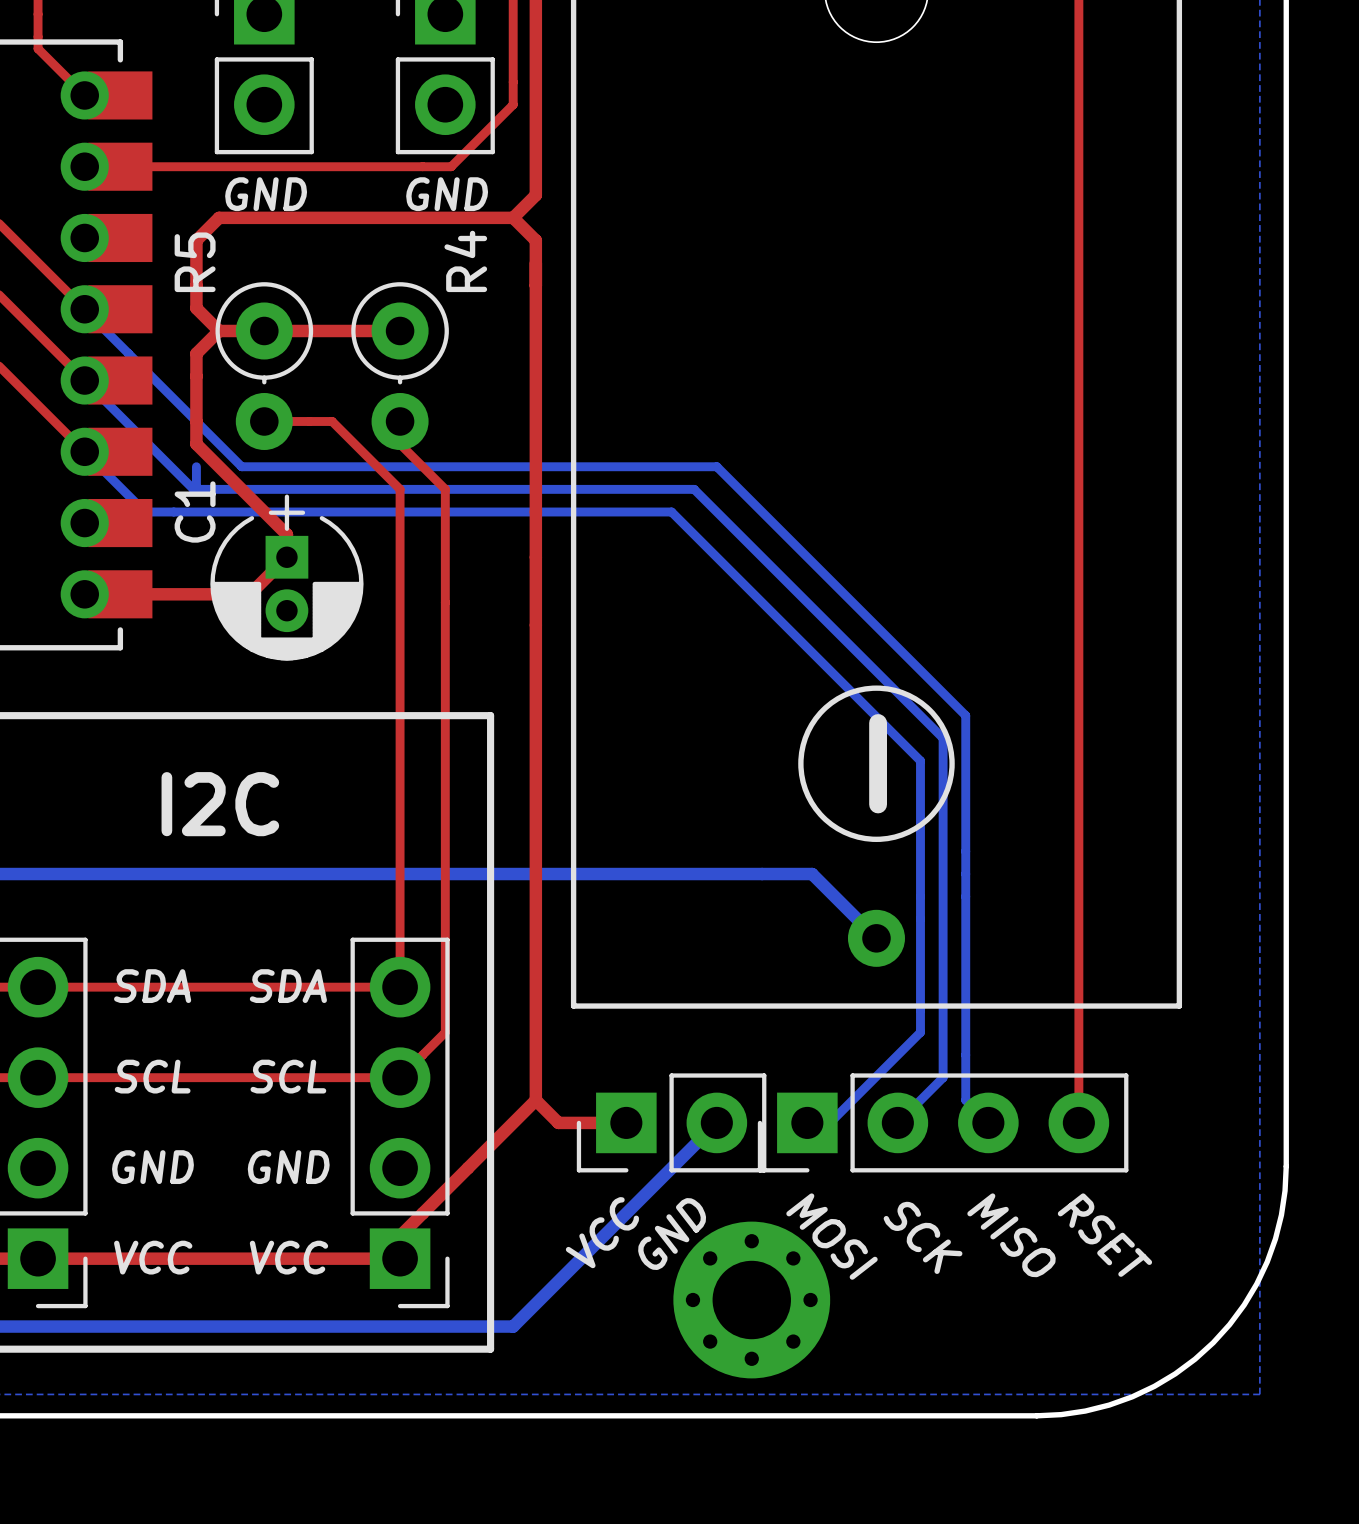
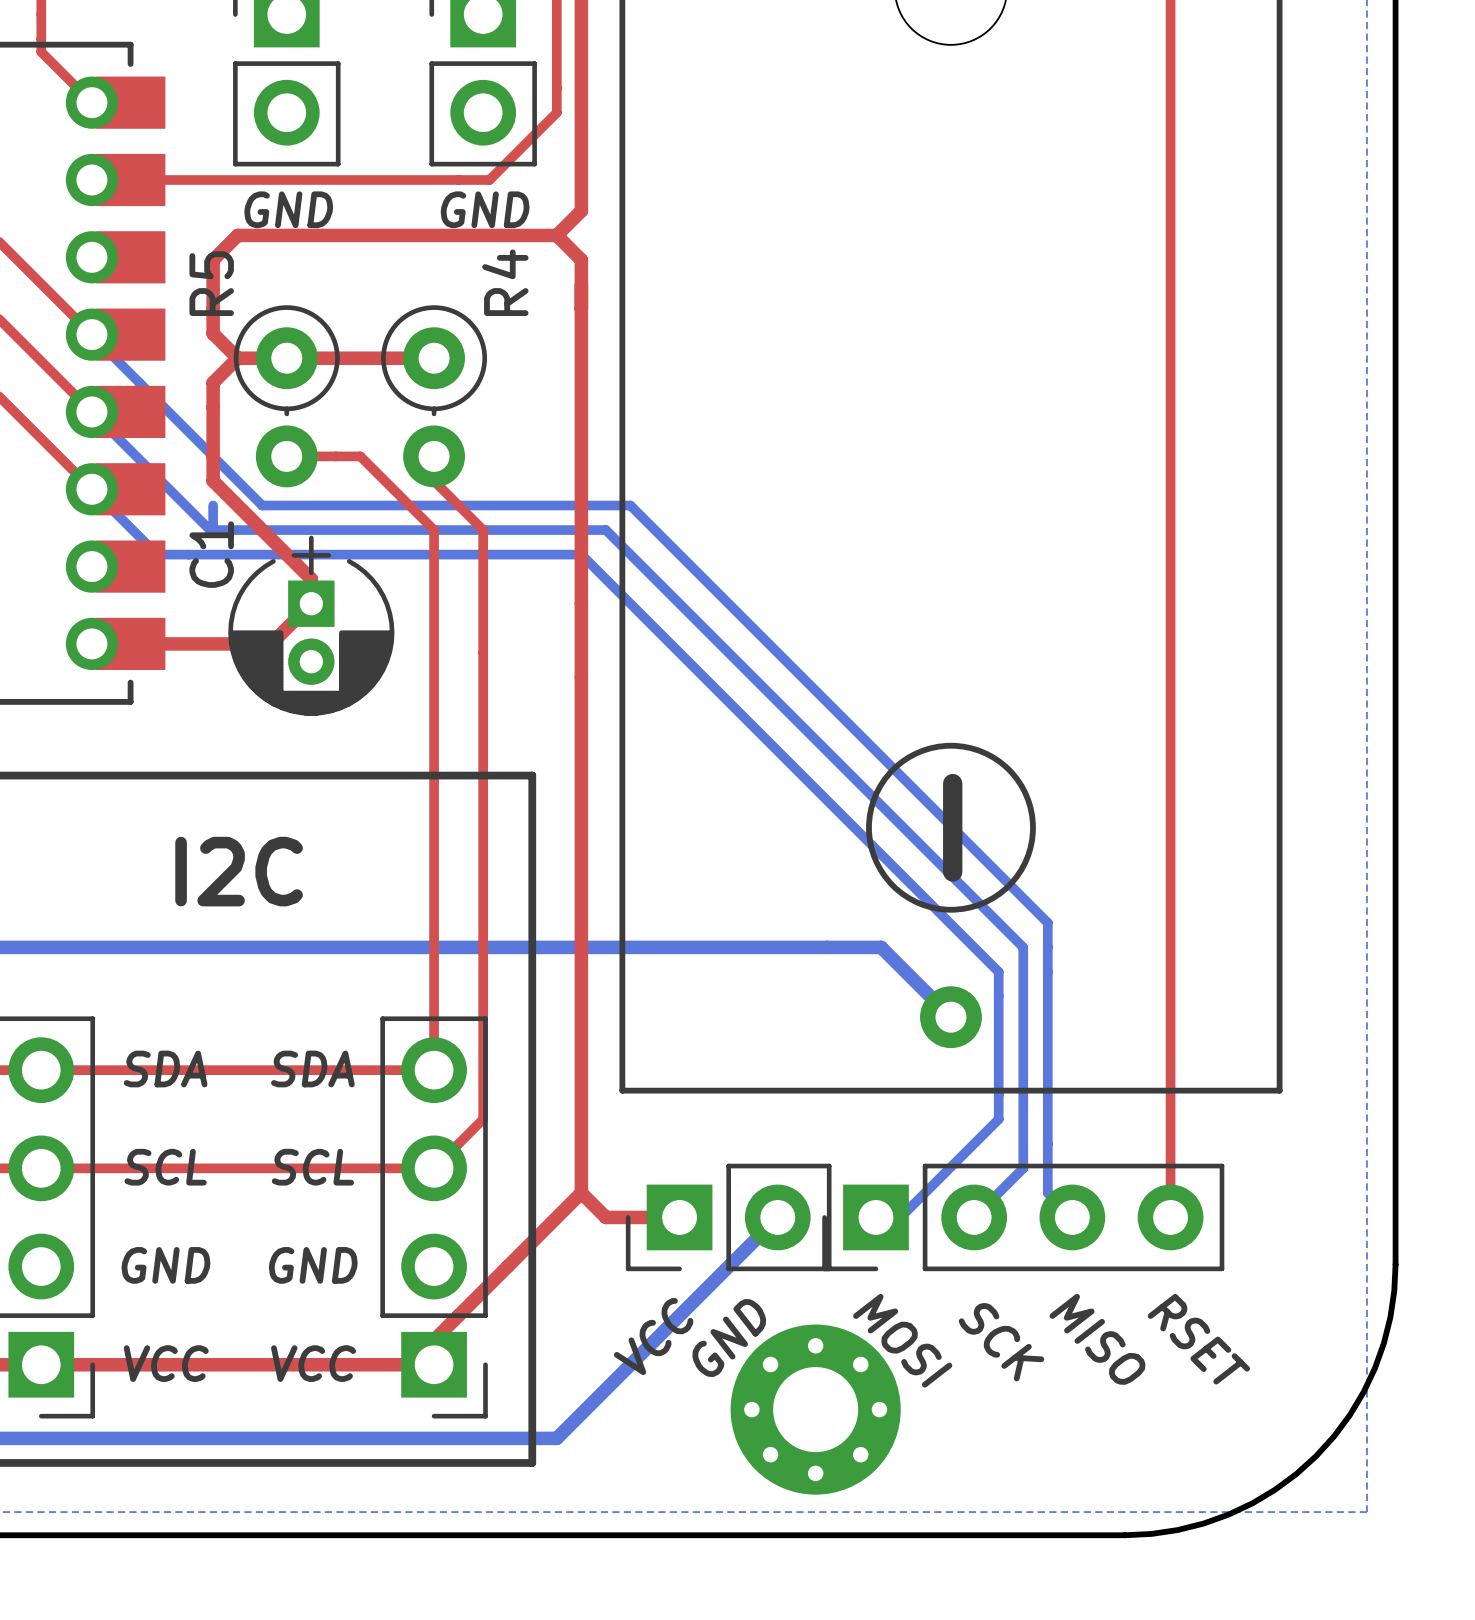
bottom track: (581, 466) (716, 466) (965, 715) (965, 851) -> (630, 505) (1047, 922)
bottom track: (558, 489) (694, 489) (943, 738) (943, 874) -> (605, 530) (1023, 947)
bottom track: (535, 512) (671, 512) (920, 760) (920, 896) -> (581, 554) (998, 971)

